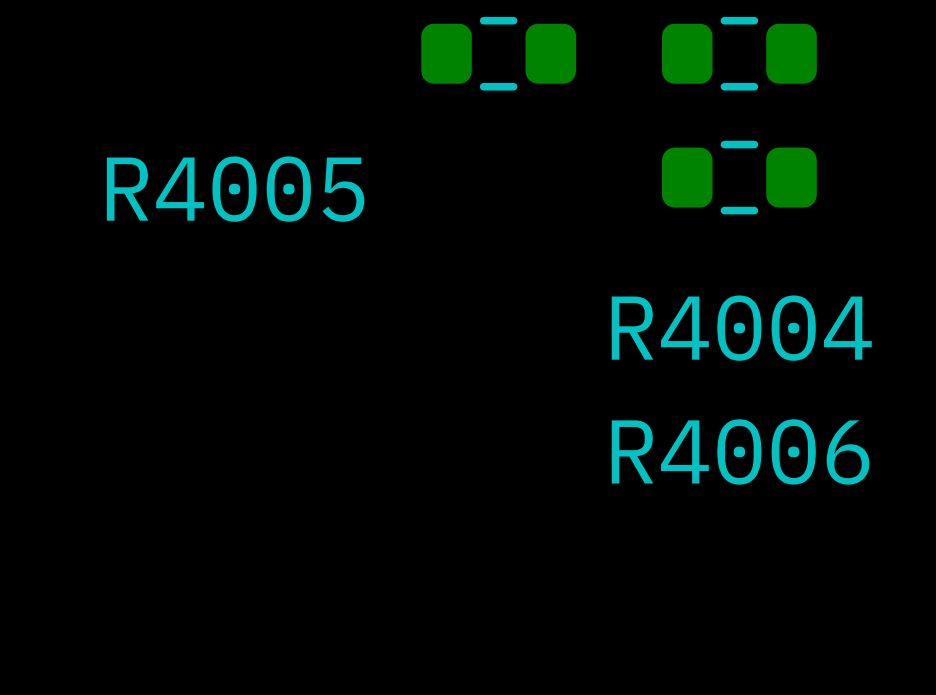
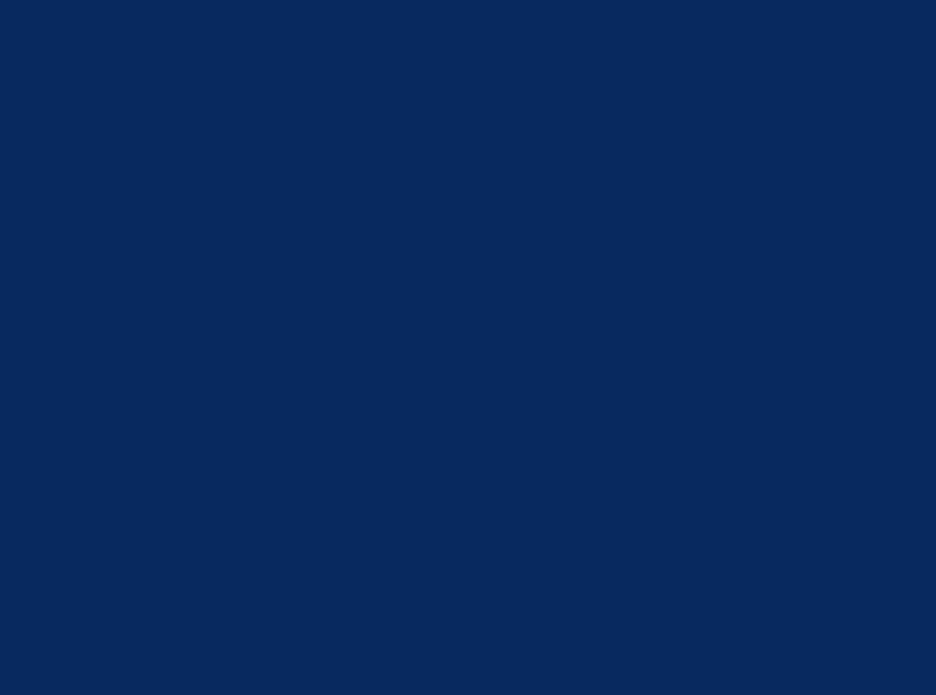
R4005: (498, 53) -> none
R4004: (739, 53) -> none
R4006: (739, 177) -> none

